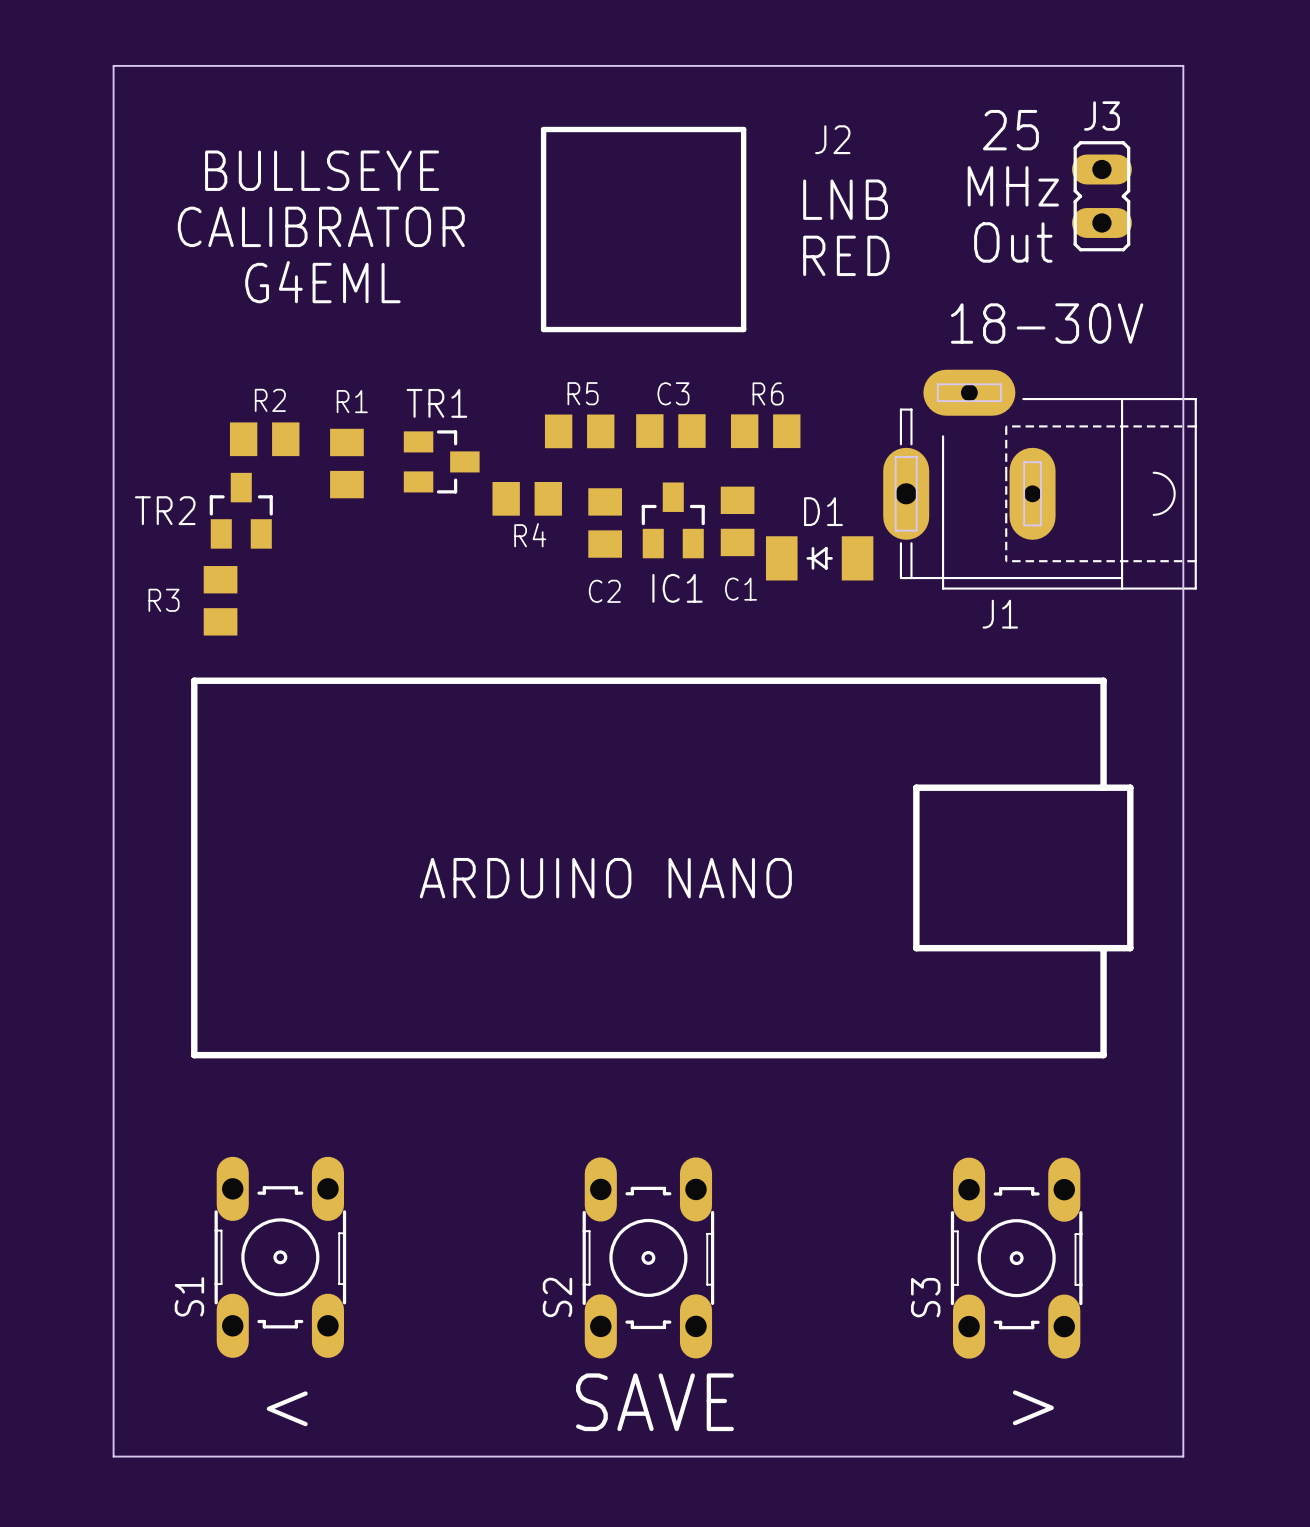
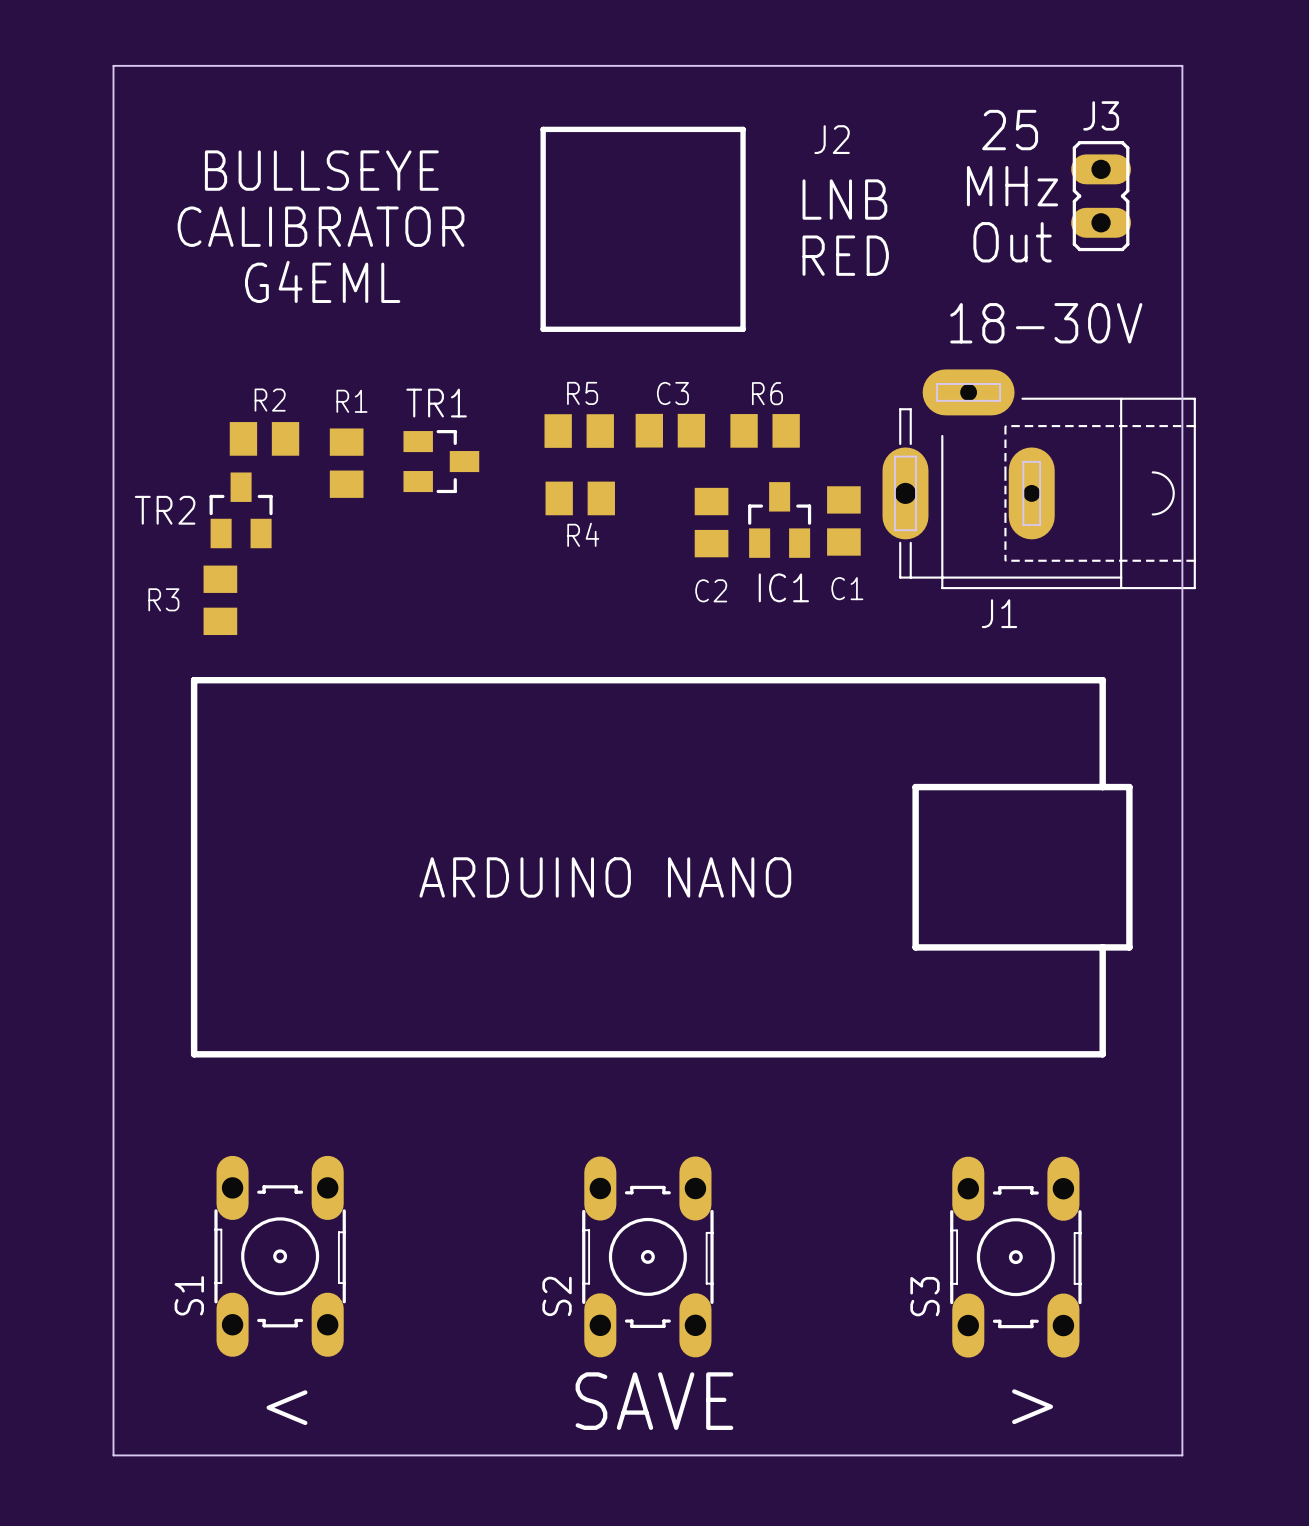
R4 position: (527, 498) -> (580, 498)
IC1 position: (673, 520) -> (779, 519)
C1 position: (737, 521) -> (843, 520)
C2 position: (605, 522) -> (711, 522)
D1: (819, 558) -> none

